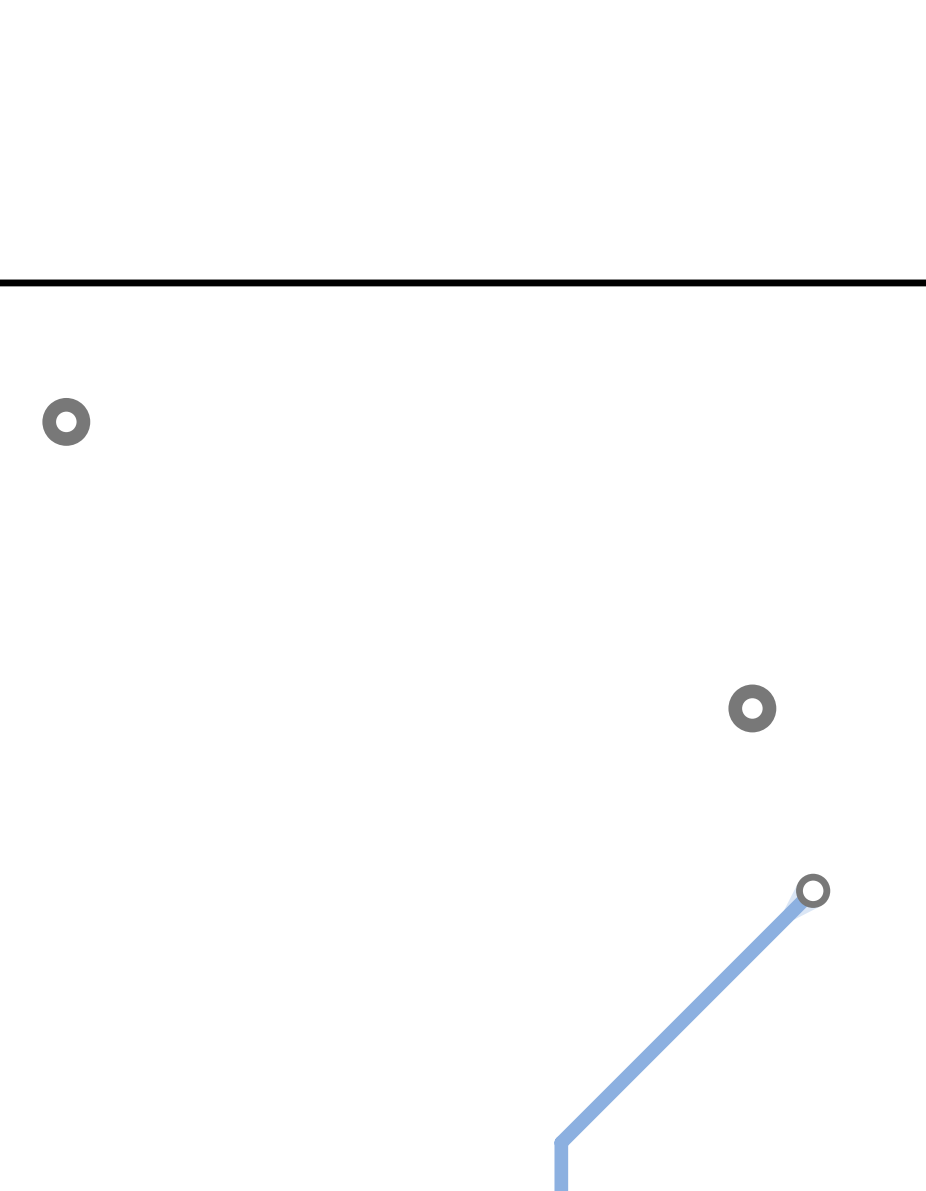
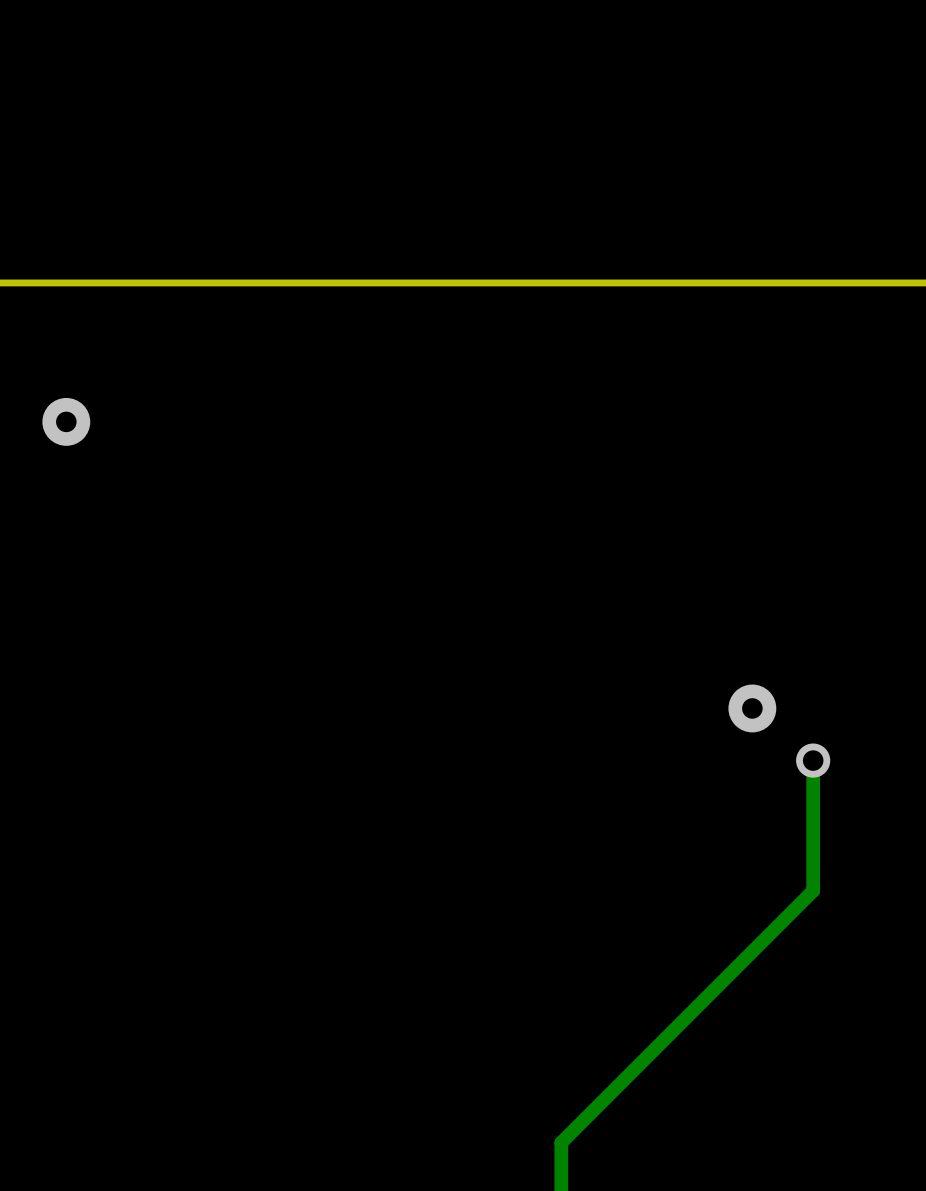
track: none -> (813, 760) (813, 890)
via position: (813, 890) -> (813, 760)

